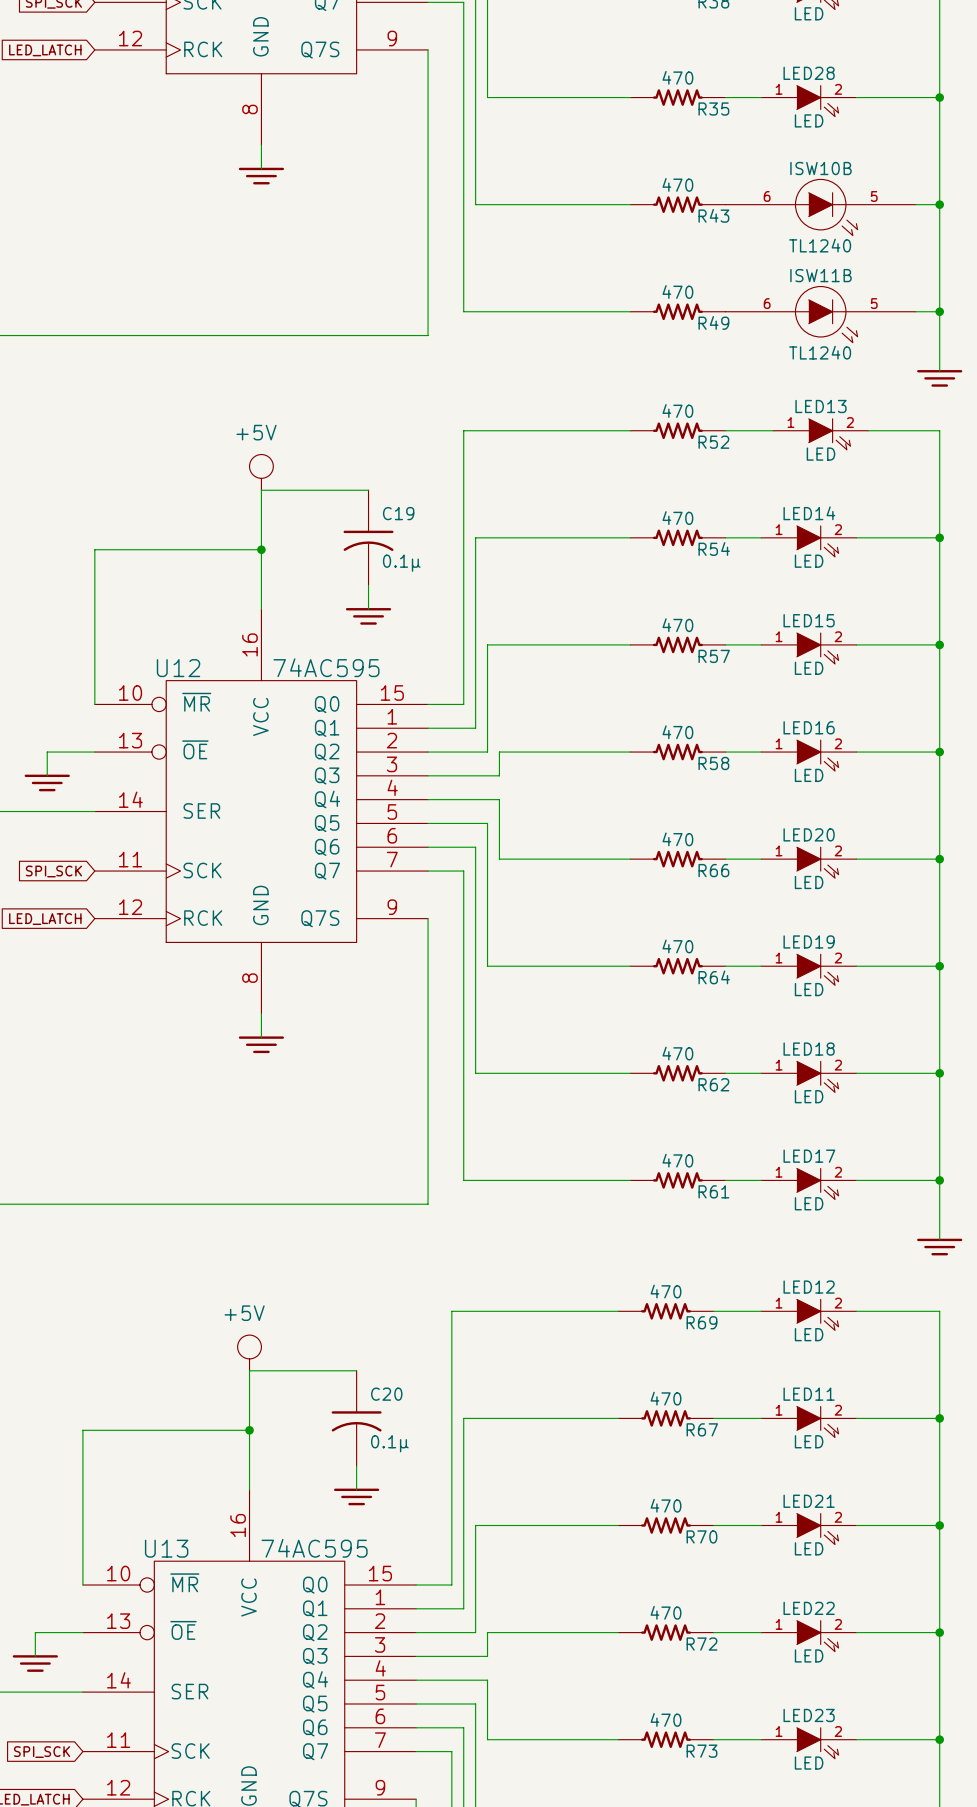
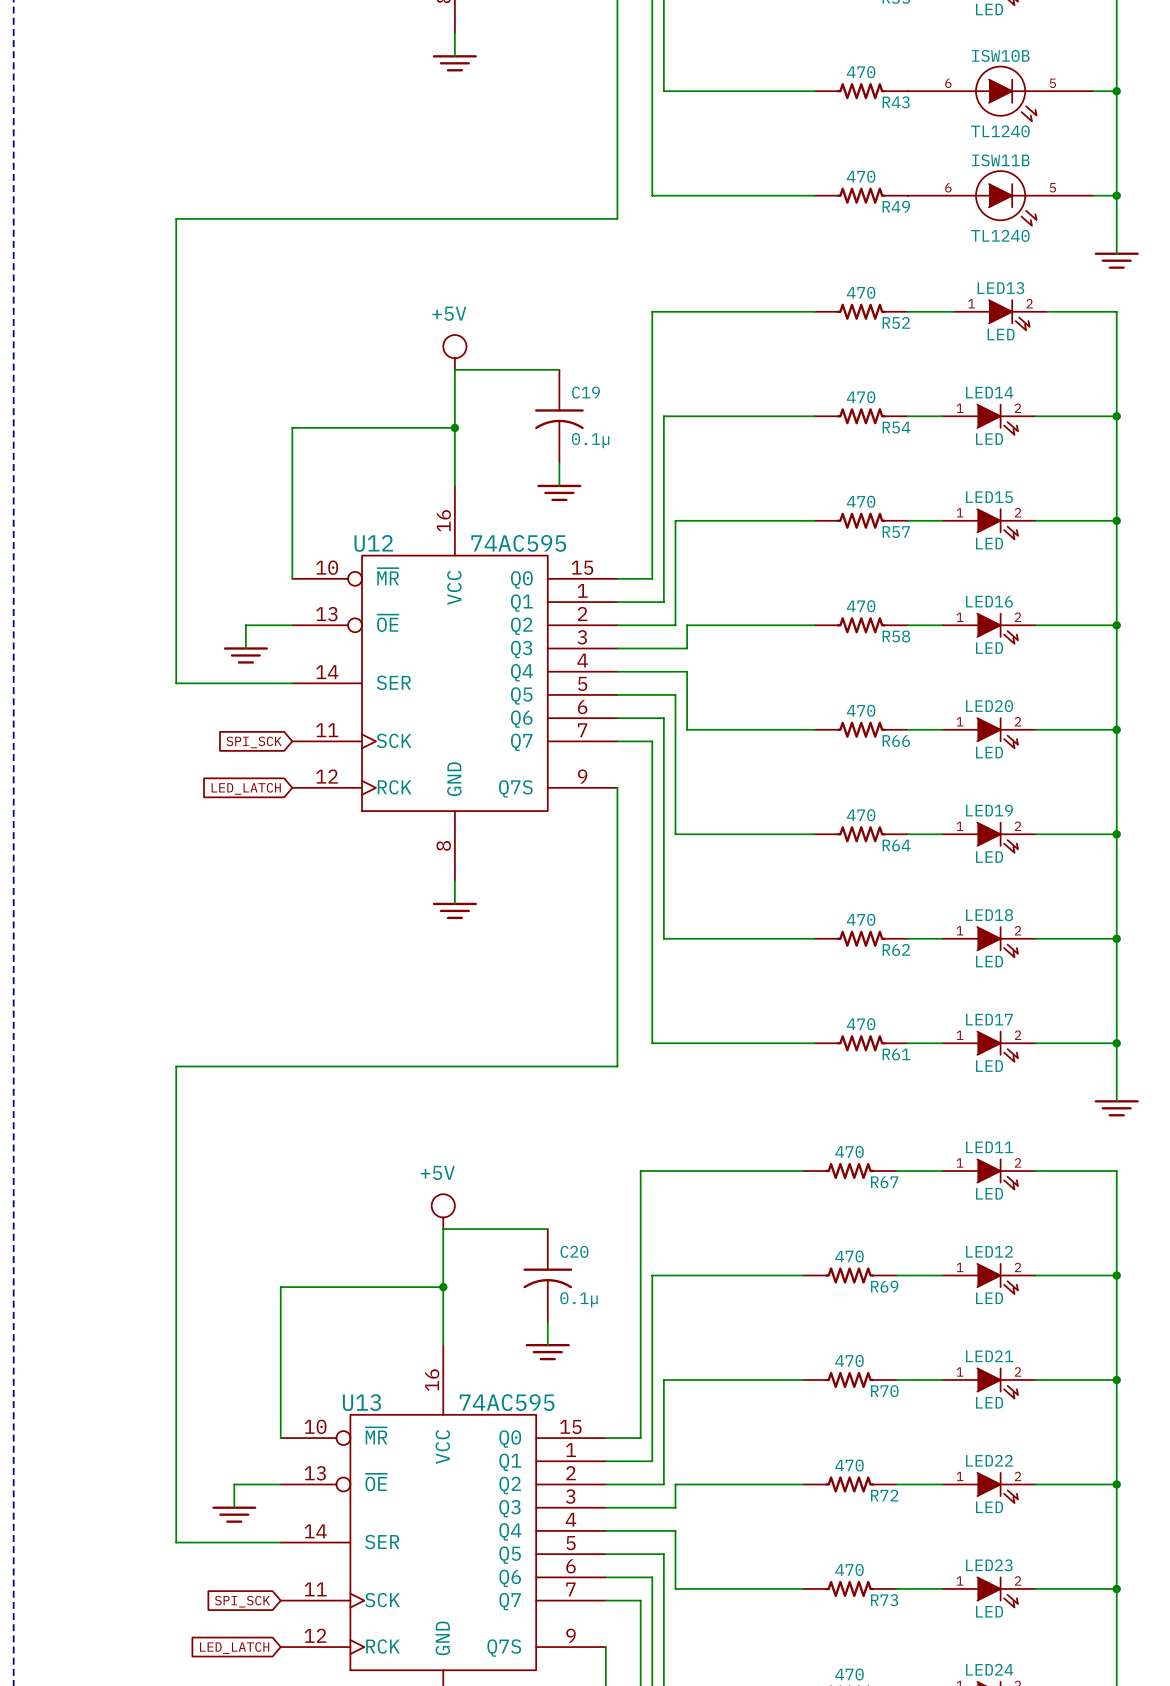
LED12 name: LED12 (809, 1287) -> LED11 (989, 1147)
R69 name: R69 (701, 1322) -> R67 (884, 1182)
LED11 name: LED11 (809, 1394) -> LED12 (989, 1251)
R67 name: R67 (702, 1429) -> R69 (884, 1286)

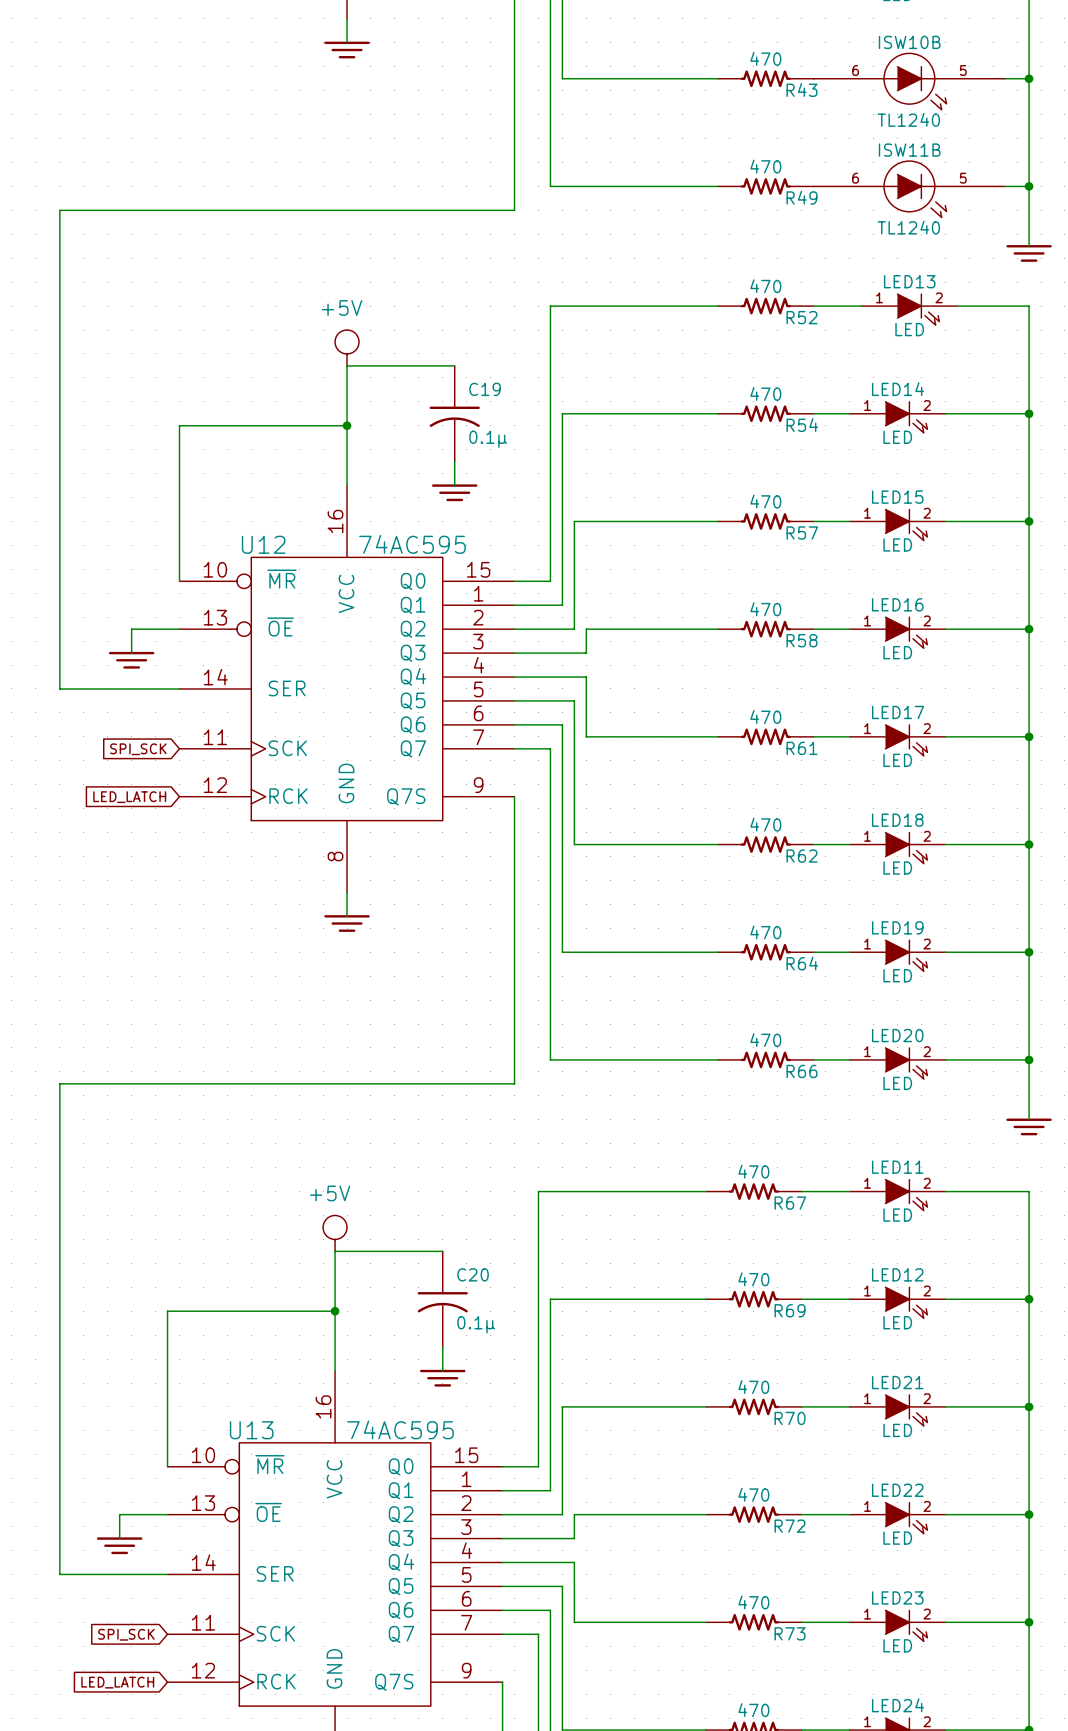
LED20 name: LED20 (989, 706) -> LED17 (898, 712)
R66 name: R66 (896, 741) -> R61 (802, 748)
LED19 name: LED19 (989, 810) -> LED18 (897, 820)
R64 name: R64 (896, 845) -> R62 (802, 856)
LED18 name: LED18 (989, 915) -> LED19 (897, 927)
R62 name: R62 (896, 949) -> R64 (802, 963)
LED17 name: LED17 (989, 1019) -> LED20 (897, 1035)
R61 name: R61 (896, 1054) -> R66 (802, 1071)

